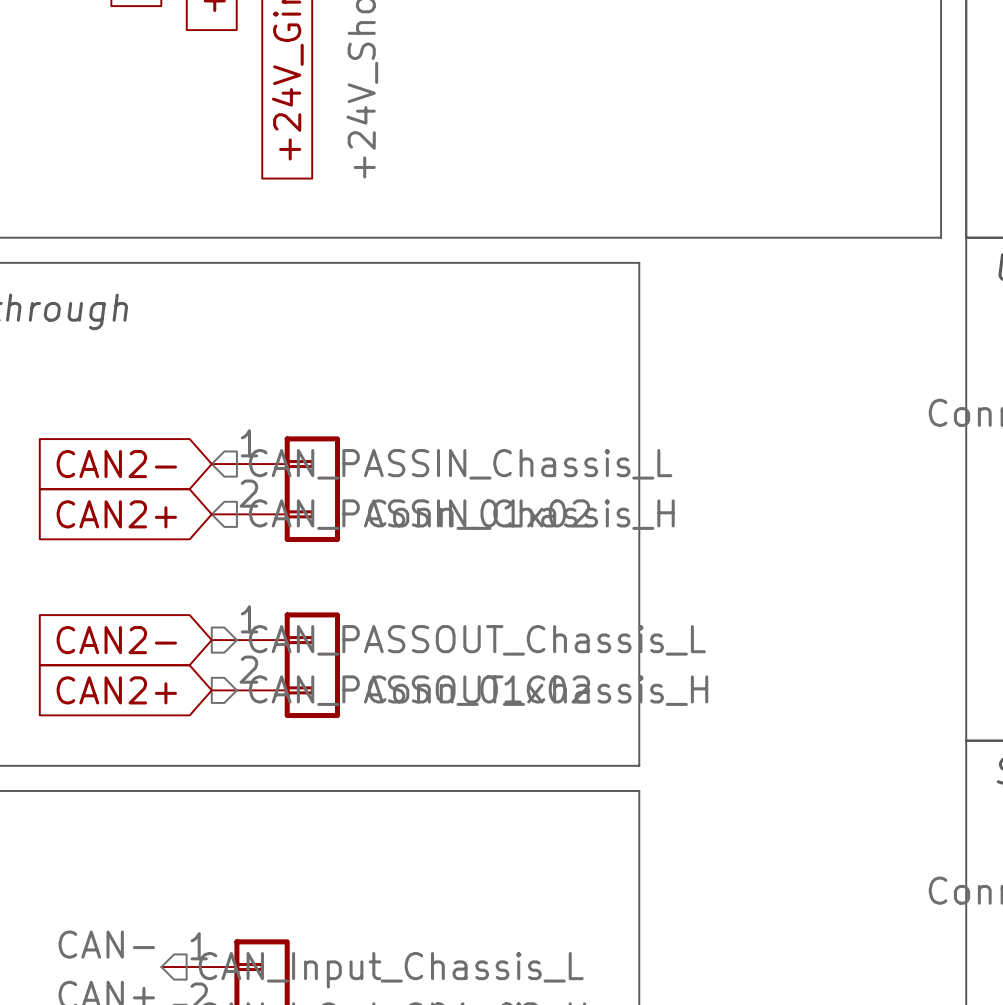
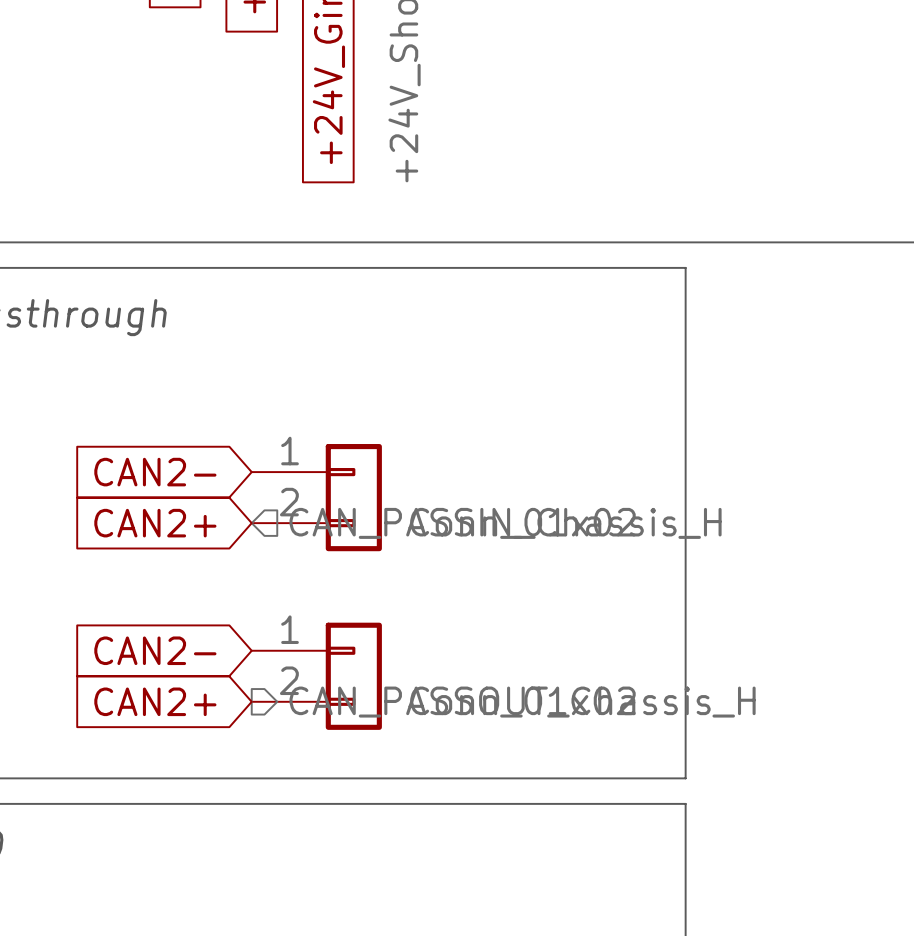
hierarchical label: CAN_PASSIN_Chassis_L (460, 464) -> none
hierarchical label: CAN_PASSOUT_Chassis_L (477, 640) -> none

